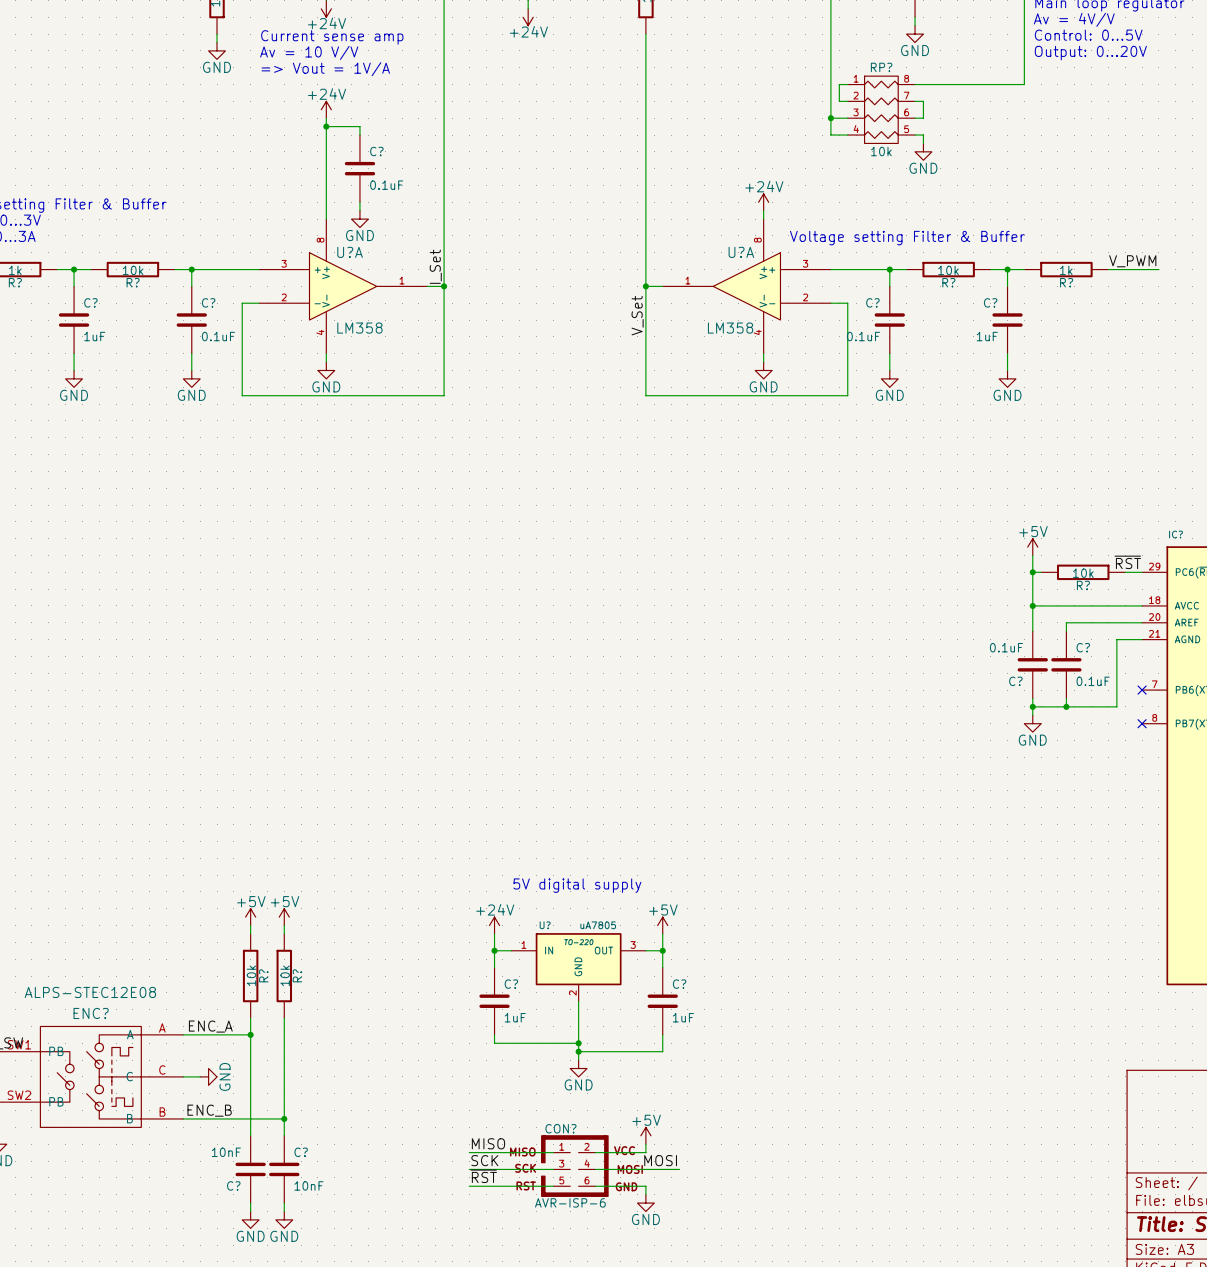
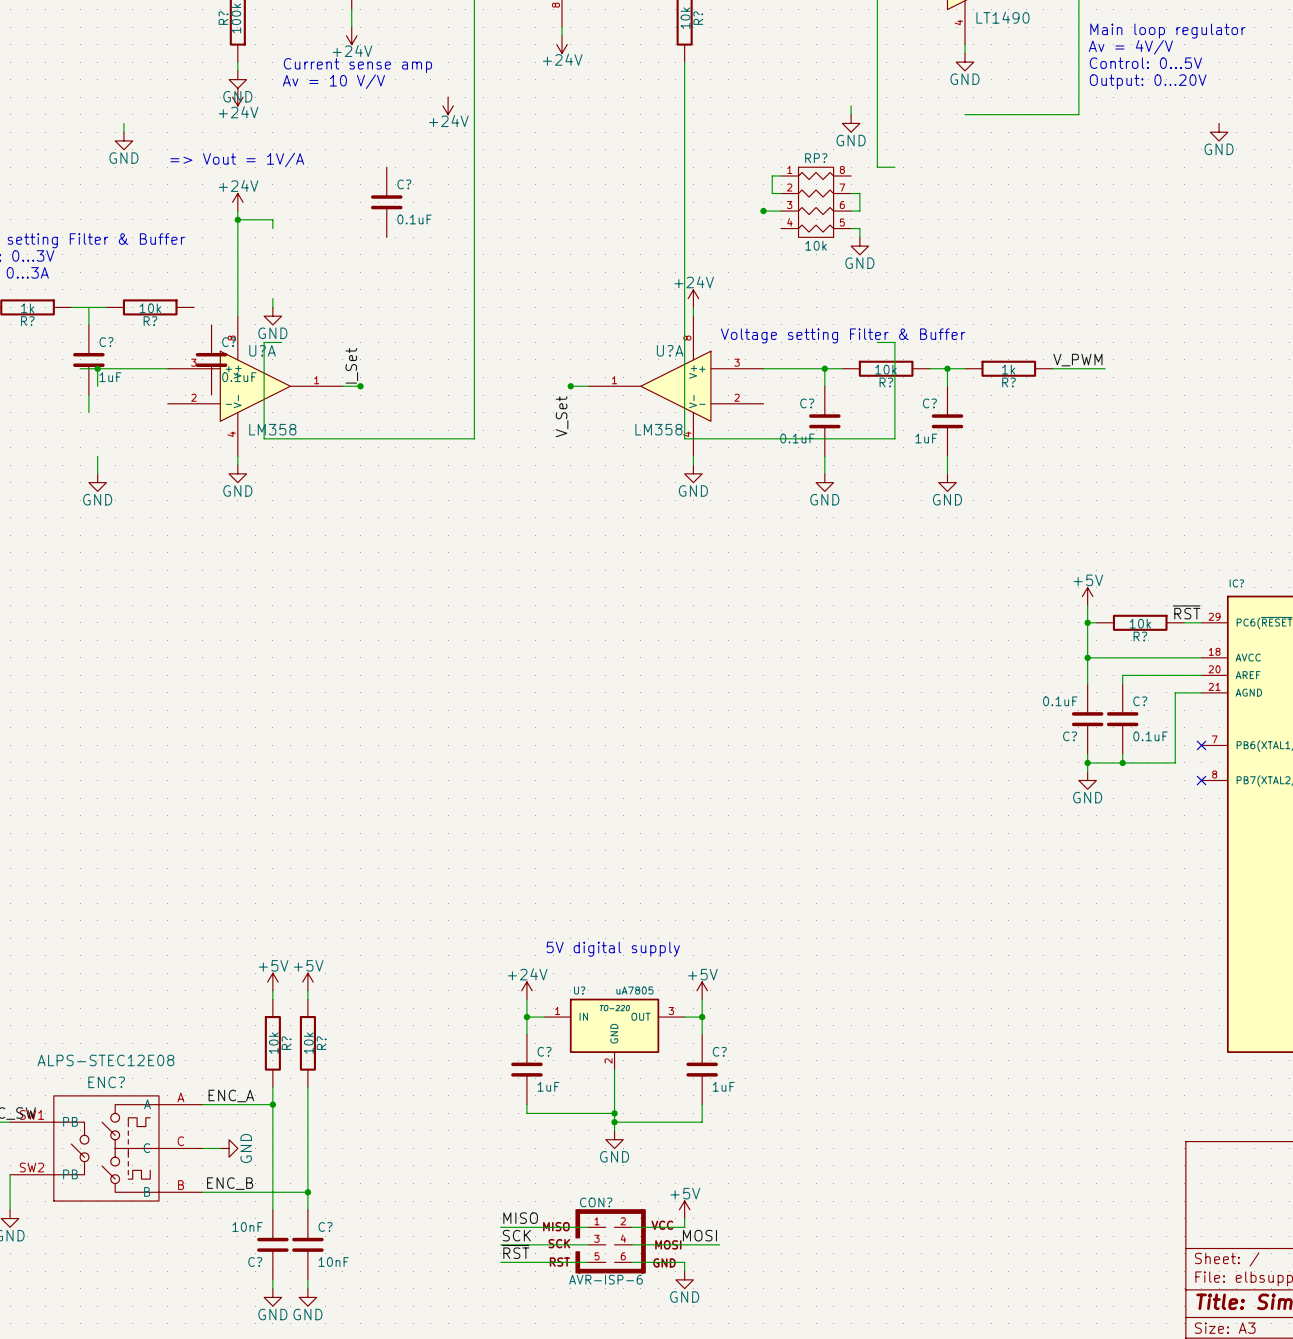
power symbol: none -> +24V (237, 97)
text position: => Vout = 1V/A (325, 69) -> => Vout = 1V/A (237, 159)
power symbol: none -> +24V (448, 105)
wire: none -> (851, 105) (851, 114)
wire: (847, 84) (839, 84) (839, 101) (847, 101) -> (781, 176) (772, 176) (772, 193) (781, 193)
wire: none -> (123, 123) (123, 132)
power symbol: none -> GND (851, 123)
wire: (915, 101) (923, 101) (923, 118) (915, 118) -> (851, 193) (859, 193) (859, 211) (851, 211)
power symbol: none -> GND (1219, 132)
power symbol: none -> GND (123, 140)
power symbol: +24V (326, 109) -> none
RP? position: (881, 109) -> (816, 202)
wire: (326, 118) (326, 219) -> (237, 211) (237, 316)
wire: (830, 118) (847, 118) -> (763, 211) (781, 211)
junction: (830, 118) -> none
wire: (326, 126) (359, 126) (359, 135) -> (237, 219) (272, 219) (272, 228)
junction: (326, 126) -> none
wire: (915, 135) (923, 135) (923, 143) -> (851, 228) (859, 228) (859, 237)
power symbol: GND (923, 151) -> none
power symbol: none -> +24V (237, 202)
junction: none -> (763, 211)
junction: none -> (237, 219)
wire: (359, 202) (359, 210) -> (272, 298) (272, 307)
power symbol position: +24V (763, 202) -> +24V (693, 298)
wire: (763, 210) (763, 219) -> (693, 307) (693, 316)
power symbol: none -> GND (859, 246)
power symbol: GND (359, 219) -> none
text position: Voltage setting Filter & Buffer (907, 238) -> Voltage setting Filter & Buffer (843, 335)
label position: V_PWM (1132, 261) -> V_PWM (1077, 360)
label position: I_Set (435, 266) -> I_Set (351, 365)
junction: (74, 269) -> none
wire: (174, 269) (259, 269) -> (80, 368) (167, 368)
wire: (191, 269) (191, 286) -> (97, 368) (97, 386)
junction: (191, 269) -> none
wire: (830, 269) (906, 269) -> (763, 368) (842, 368)
wire: (889, 269) (889, 286) -> (824, 368) (824, 386)
junction: (889, 269) -> none
R? position: (948, 269) -> (886, 368)
wire: (990, 269) (1024, 269) -> (929, 368) (964, 368)
wire: (1007, 269) (1007, 286) -> (947, 368) (947, 386)
junction: (1007, 269) -> none
R? position: (1066, 269) -> (1008, 368)
wire: (1108, 269) (1158, 269) -> (1052, 368) (1105, 368)
power symbol: none -> GND (272, 316)
U?A position: (343, 286) -> (255, 386)
wire: (427, 286) (444, 286) -> (342, 386) (360, 386)
junction: (444, 286) -> none
wire: (645, 286) (662, 286) -> (570, 386) (588, 386)
junction: (645, 286) -> none
U?A position: (746, 286) -> (675, 386)
label position: V_Set (637, 315) -> V_Set (562, 416)
C? position: (889, 320) -> (824, 421)
C? position: (1007, 320) -> (947, 421)
junction: none -> (97, 368)
junction: none -> (824, 368)
junction: none -> (947, 368)
junction: none -> (360, 386)
junction: none -> (570, 386)
wire: (191, 353) (191, 370) -> (97, 456) (97, 473)
wire: (326, 353) (326, 362) -> (237, 456) (237, 465)
wire: (763, 353) (763, 362) -> (693, 456) (693, 465)
wire: (889, 353) (889, 370) -> (824, 456) (824, 473)
wire: (1007, 353) (1007, 370) -> (947, 456) (947, 473)
power symbol: GND (326, 370) -> none
power symbol: GND (763, 370) -> none
power symbol position: GND (74, 378) -> GND (97, 482)
power symbol position: GND (191, 378) -> GND (237, 473)
power symbol position: GND (889, 378) -> GND (947, 482)
power symbol: GND (1007, 378) -> none
power symbol: none -> GND (693, 473)
power symbol: none -> GND (824, 482)

